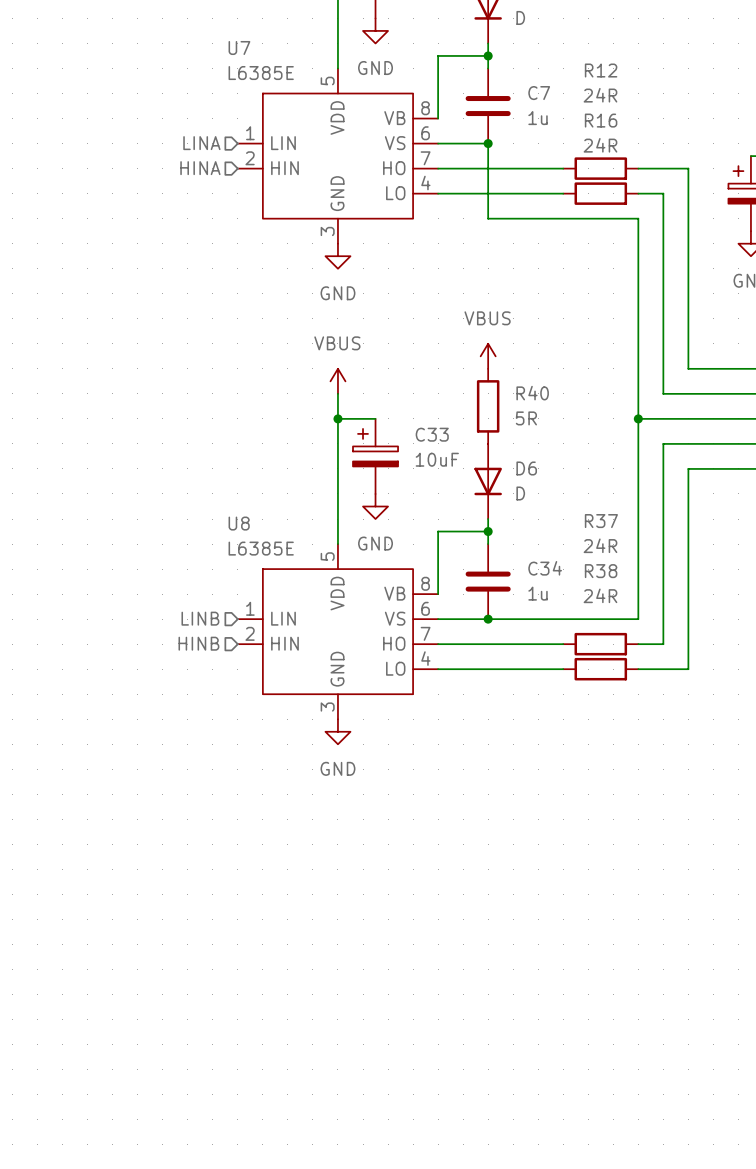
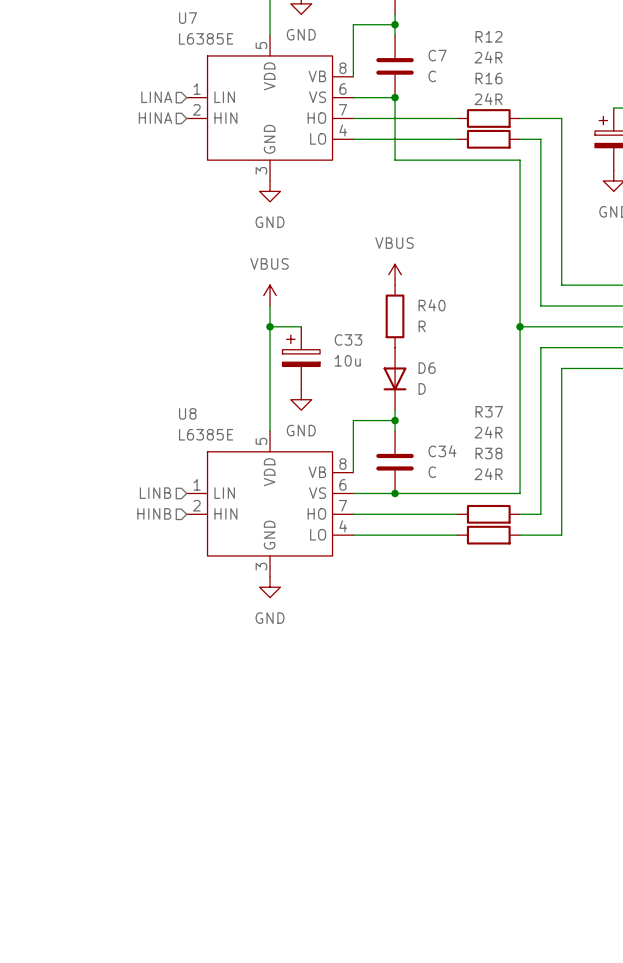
C7 value: 1u (538, 118) -> C (432, 76)
R40 value: 5R (526, 418) -> R (422, 326)
C33 value: 10uF (437, 459) -> 10u (347, 360)
C34 value: 1u (538, 593) -> C (432, 472)

